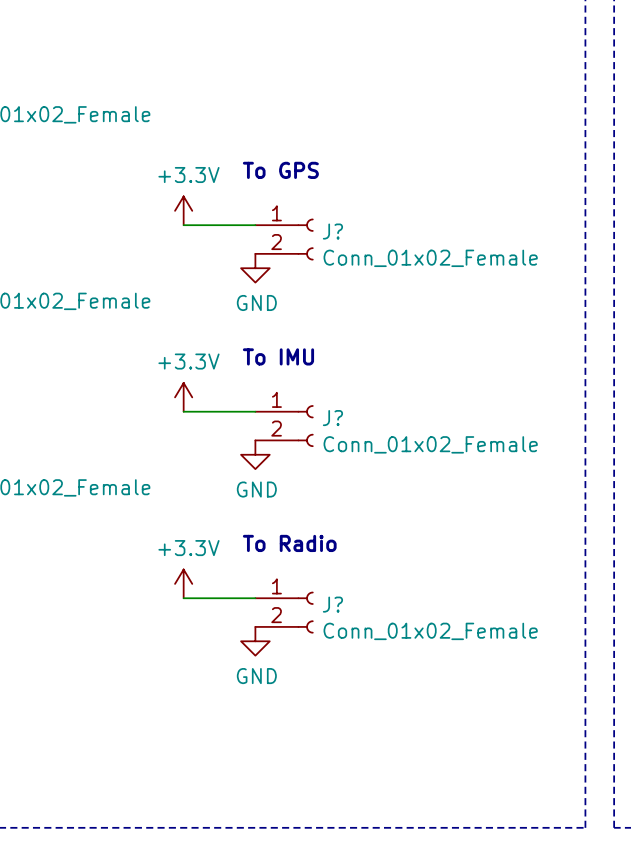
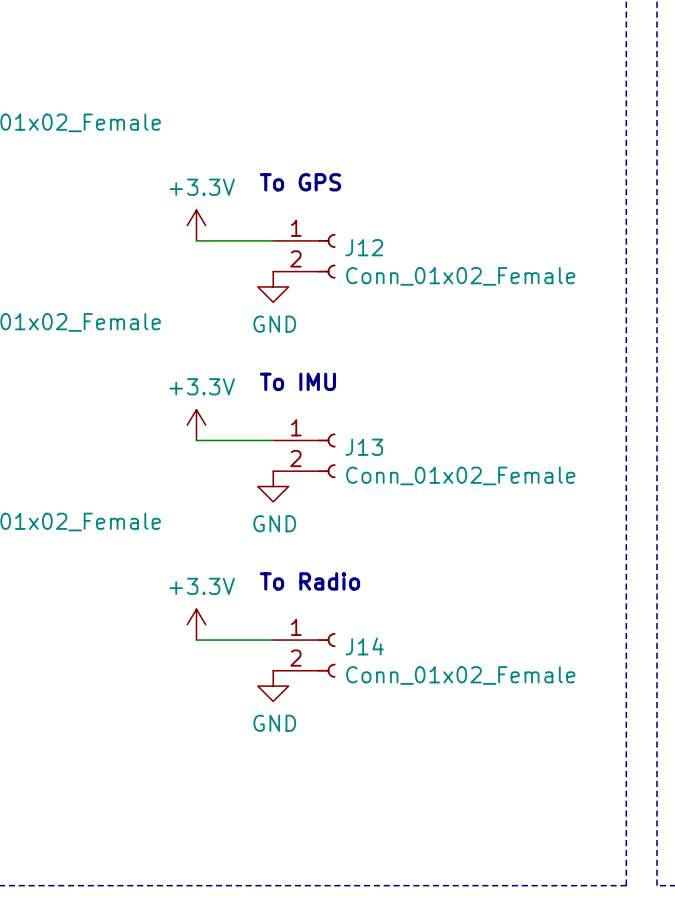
J? name: J? (332, 231) -> J12 (364, 247)
J? name: J? (332, 418) -> J13 (364, 447)
J? name: J? (332, 604) -> J14 (364, 646)

